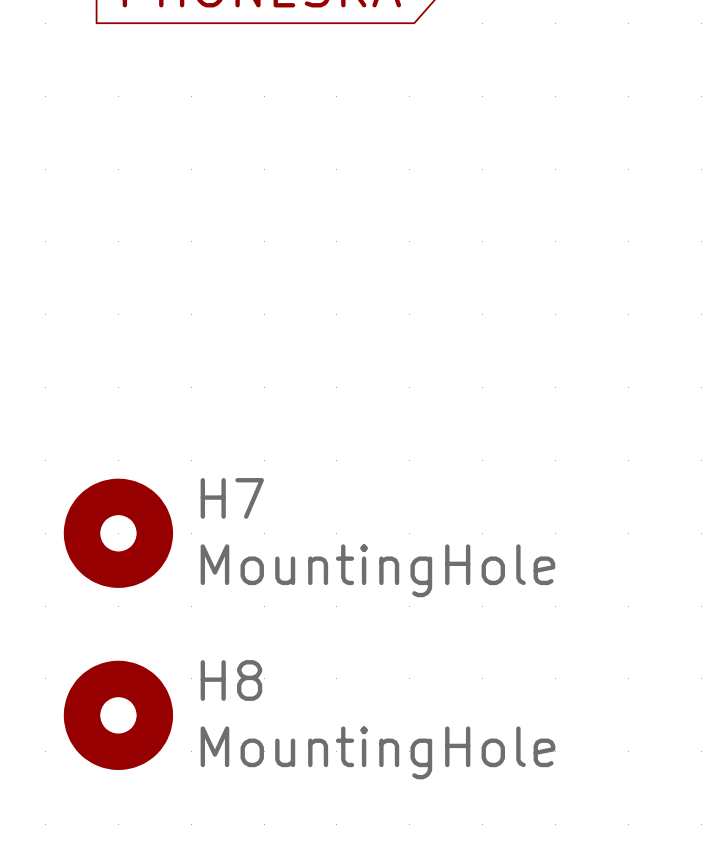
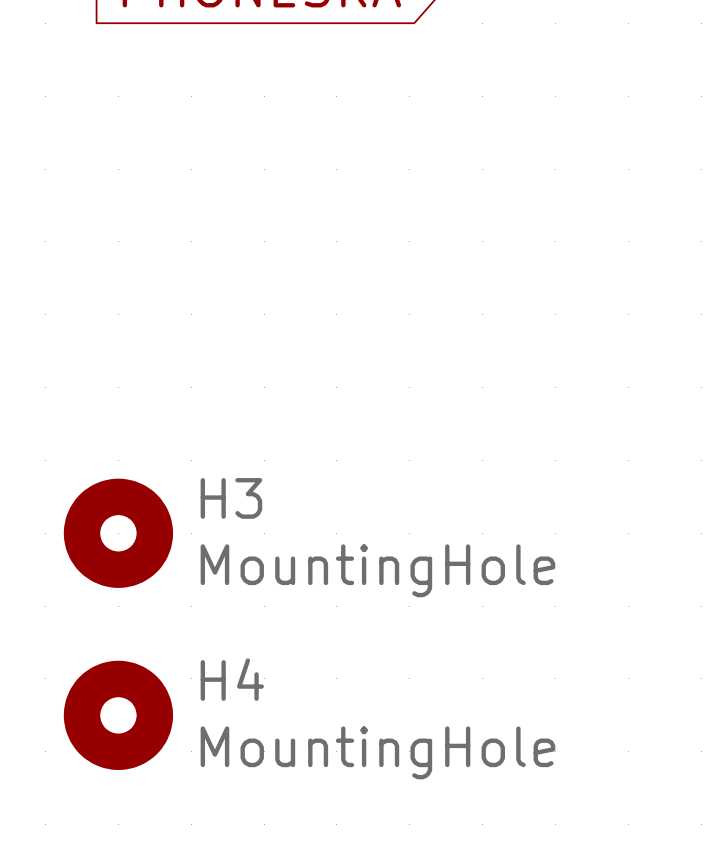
H7 name: H7 (232, 498) -> H3 (231, 498)
H8 name: H8 (231, 680) -> H4 (232, 679)

